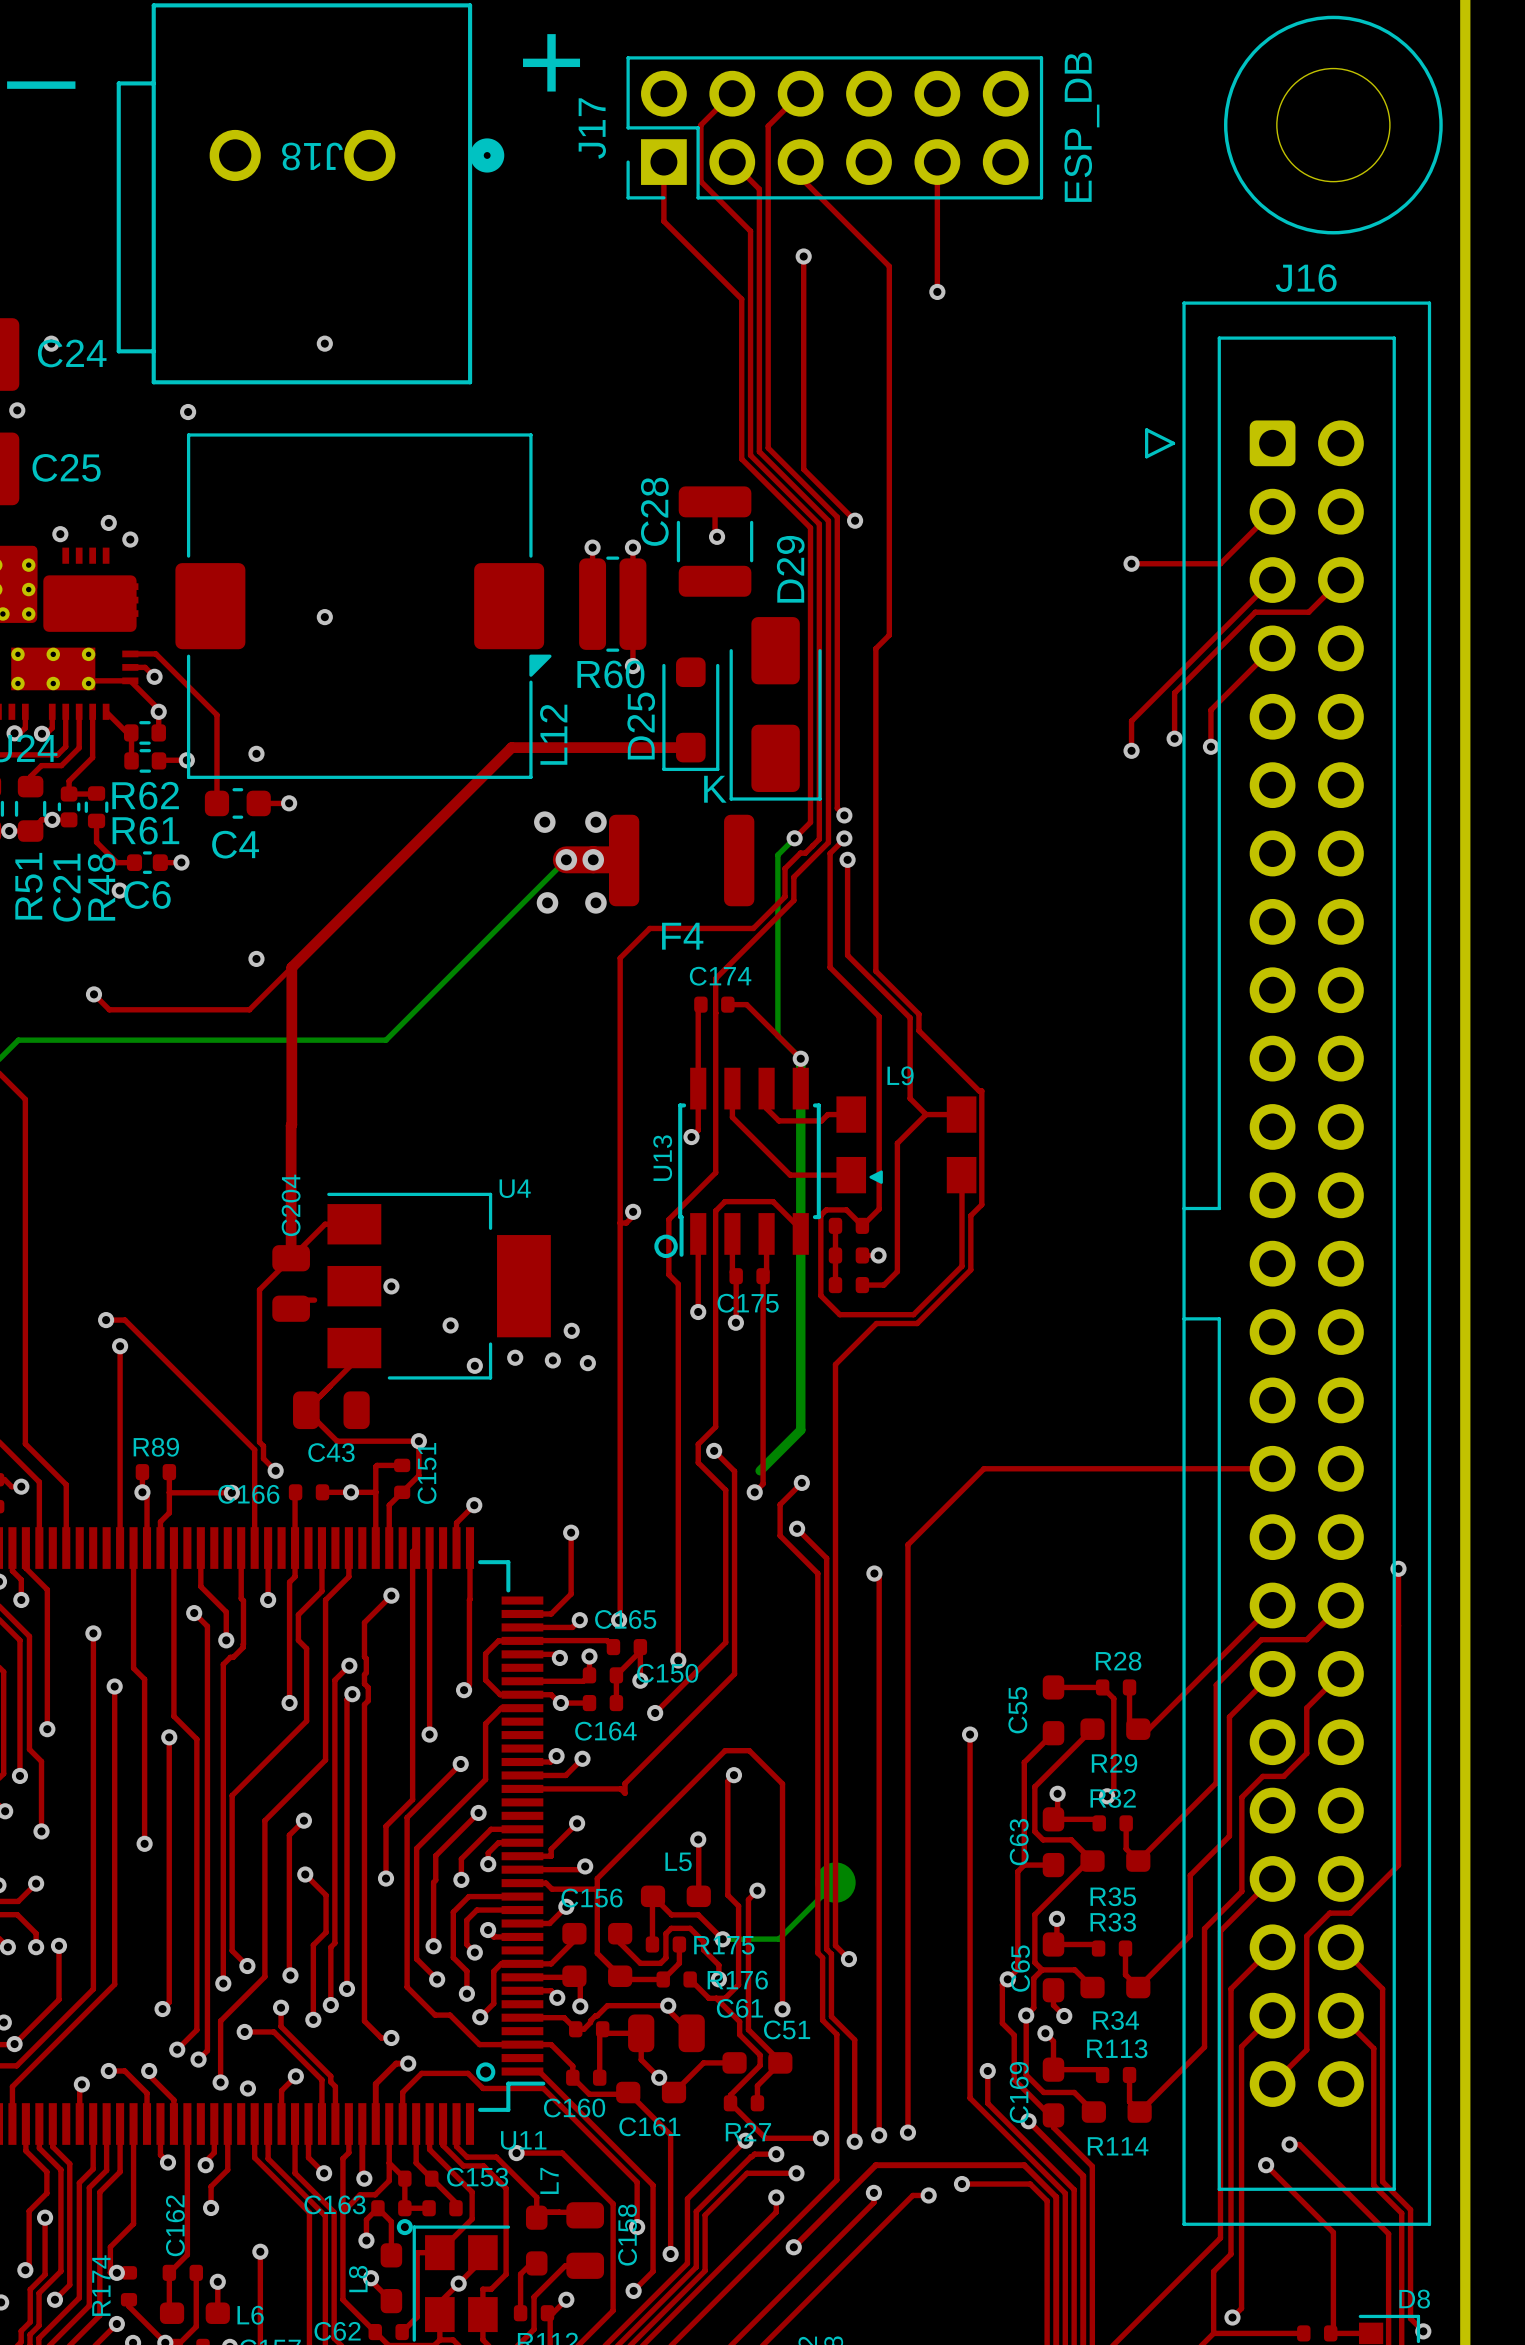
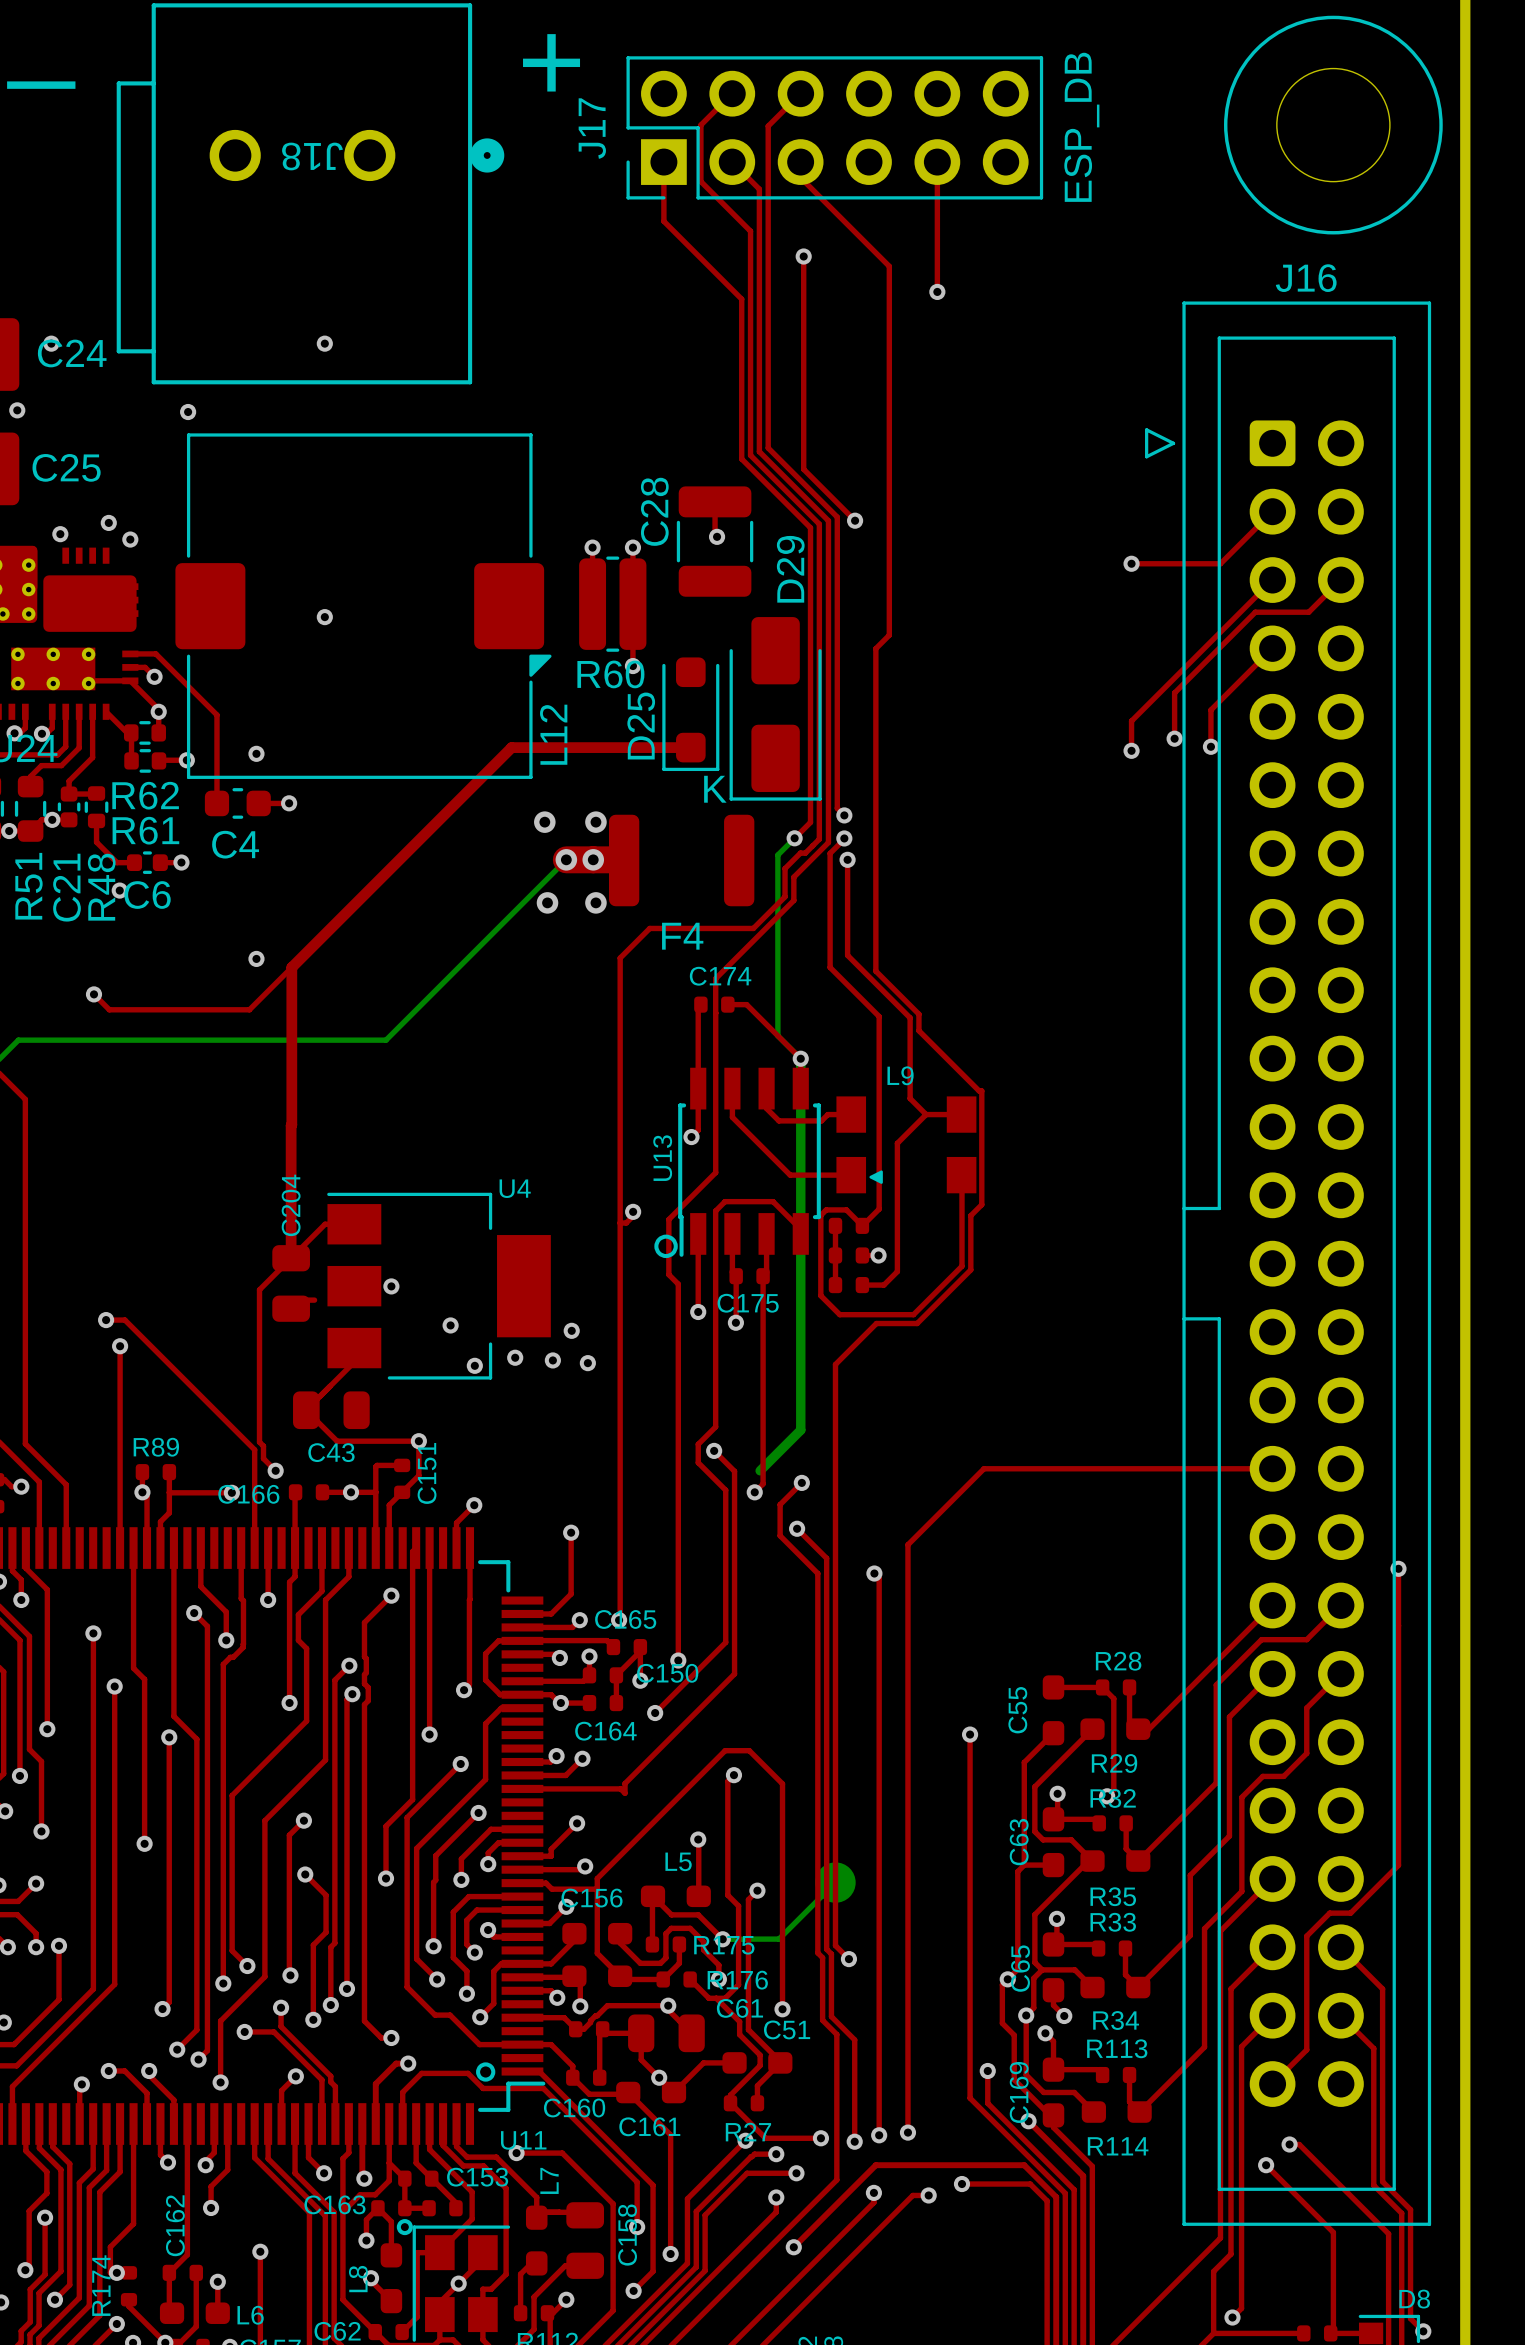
via: (14, 2044) -> none
via: (247, 2088) -> none

